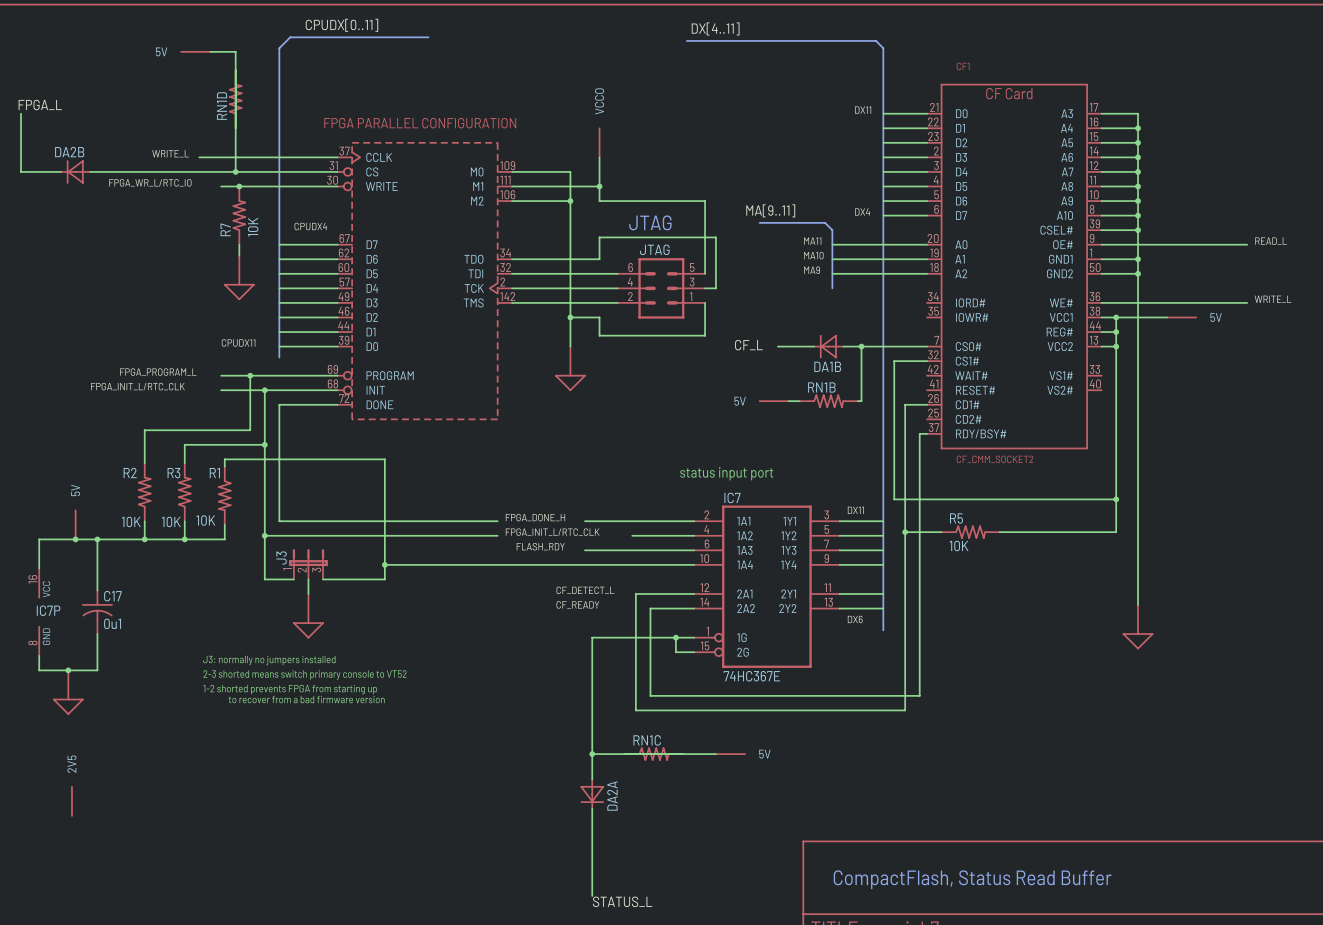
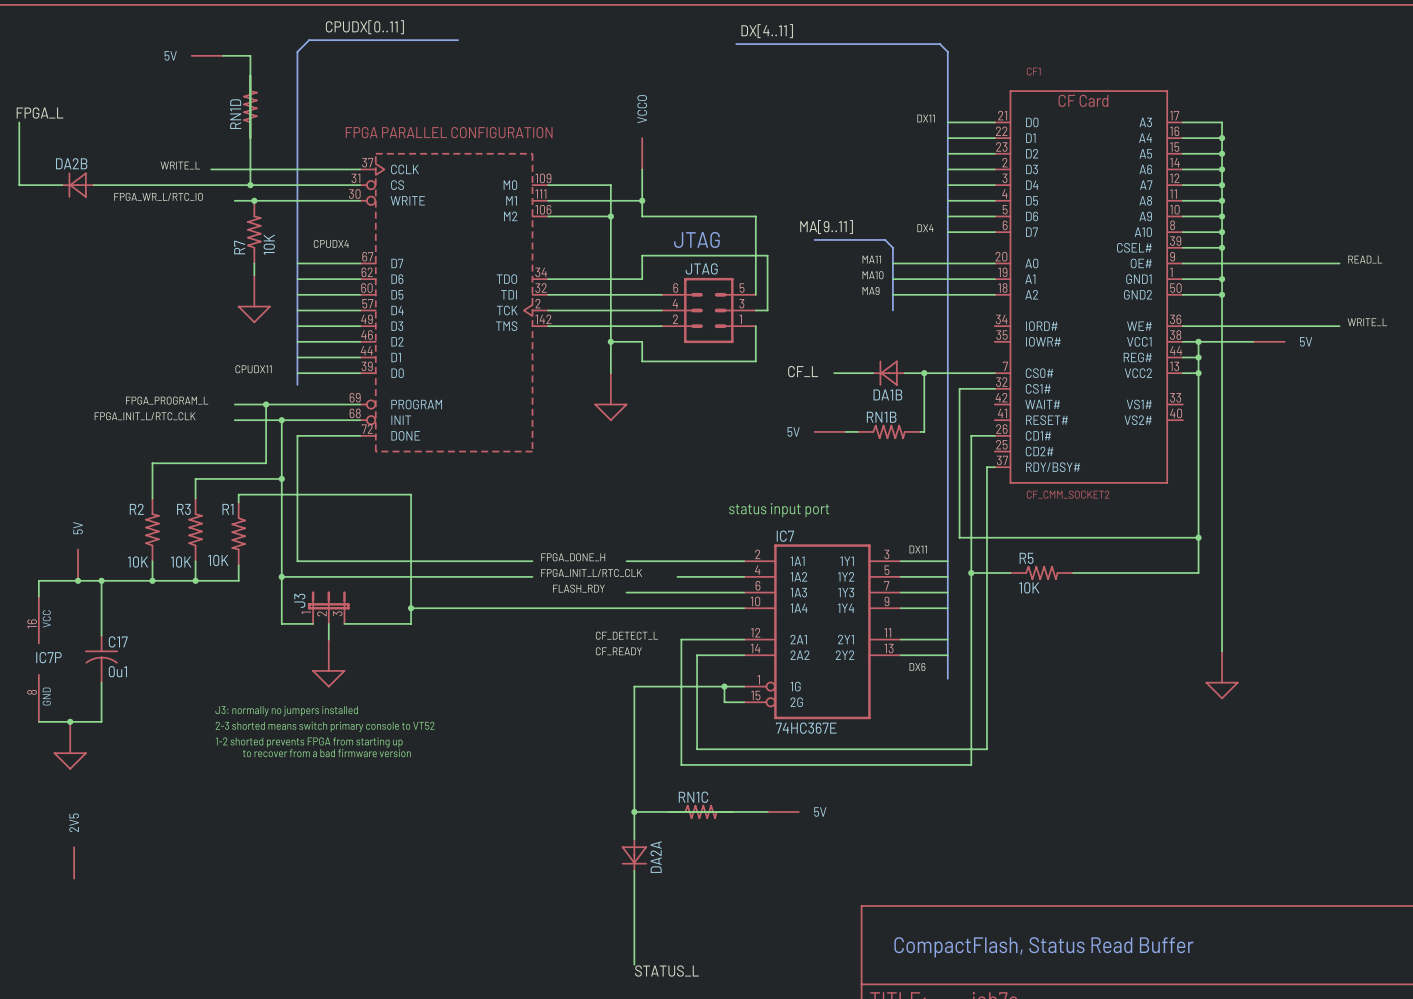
IC7P symbol: [39, 568, 40, 656] -> [38, 596, 39, 722]

